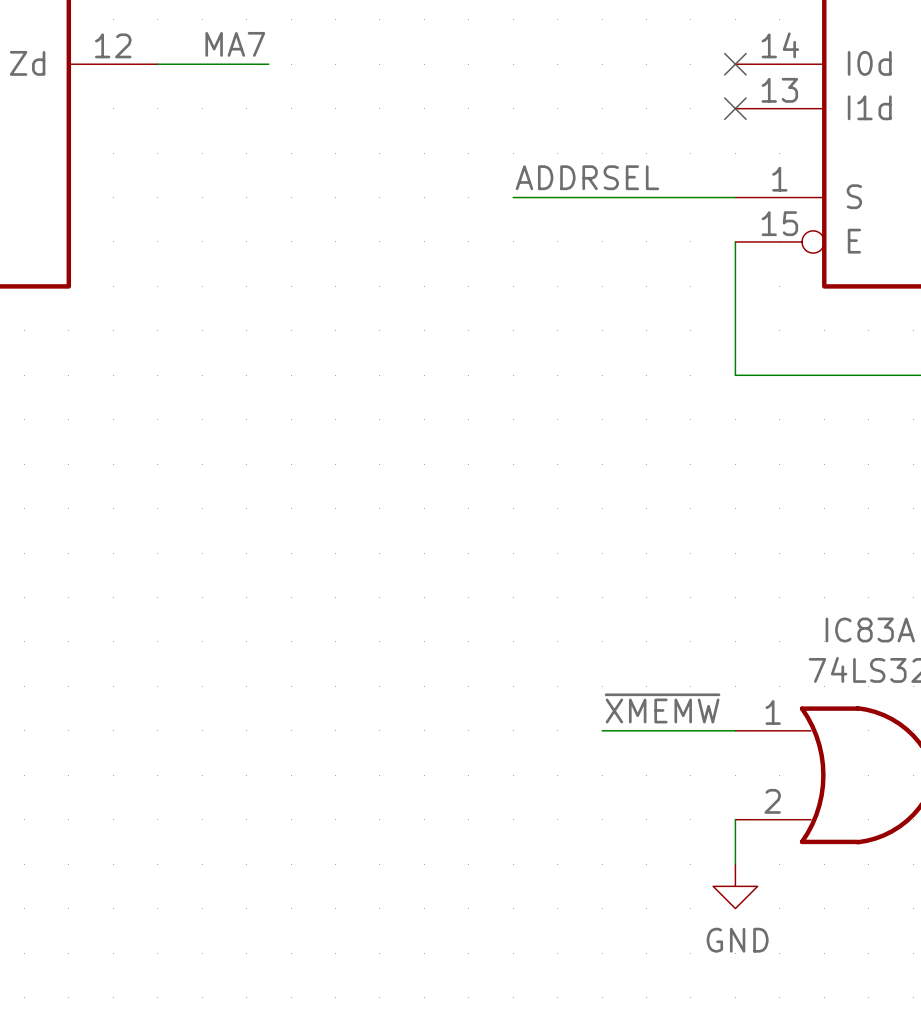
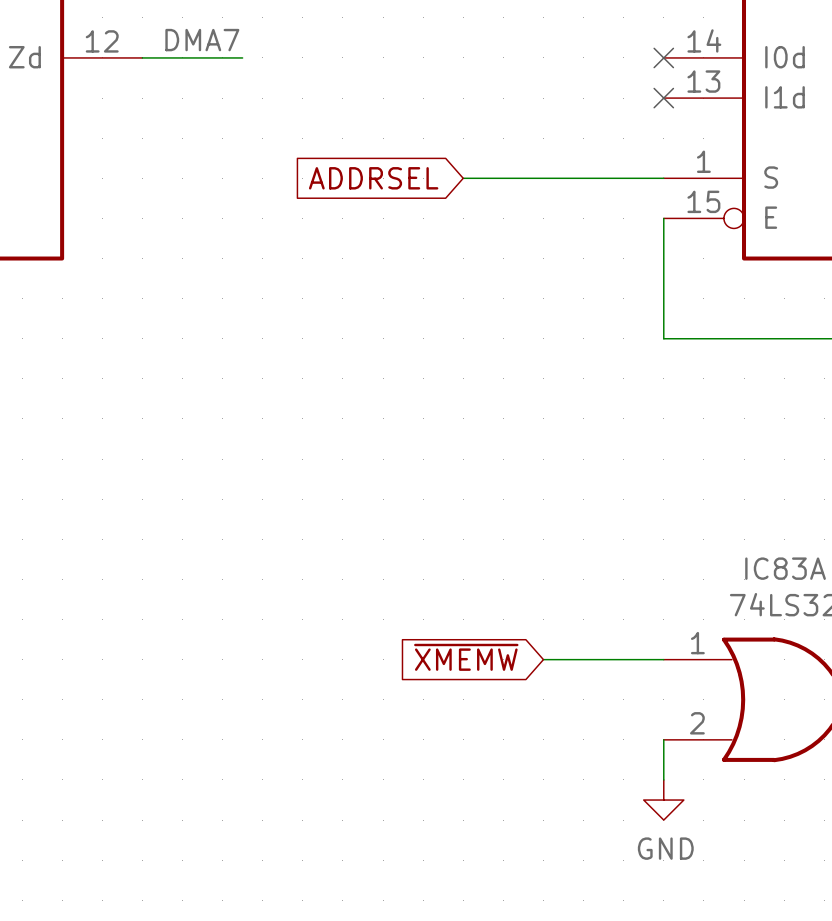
label: MA7 (235, 44) -> DMA7 (202, 40)
label: ADDRSEL (587, 177) -> none
global label: none -> ADDRSEL (373, 178)
label: ~{XMEMW} (662, 708) -> none
global label: none -> ~{XMEMW} (466, 657)

